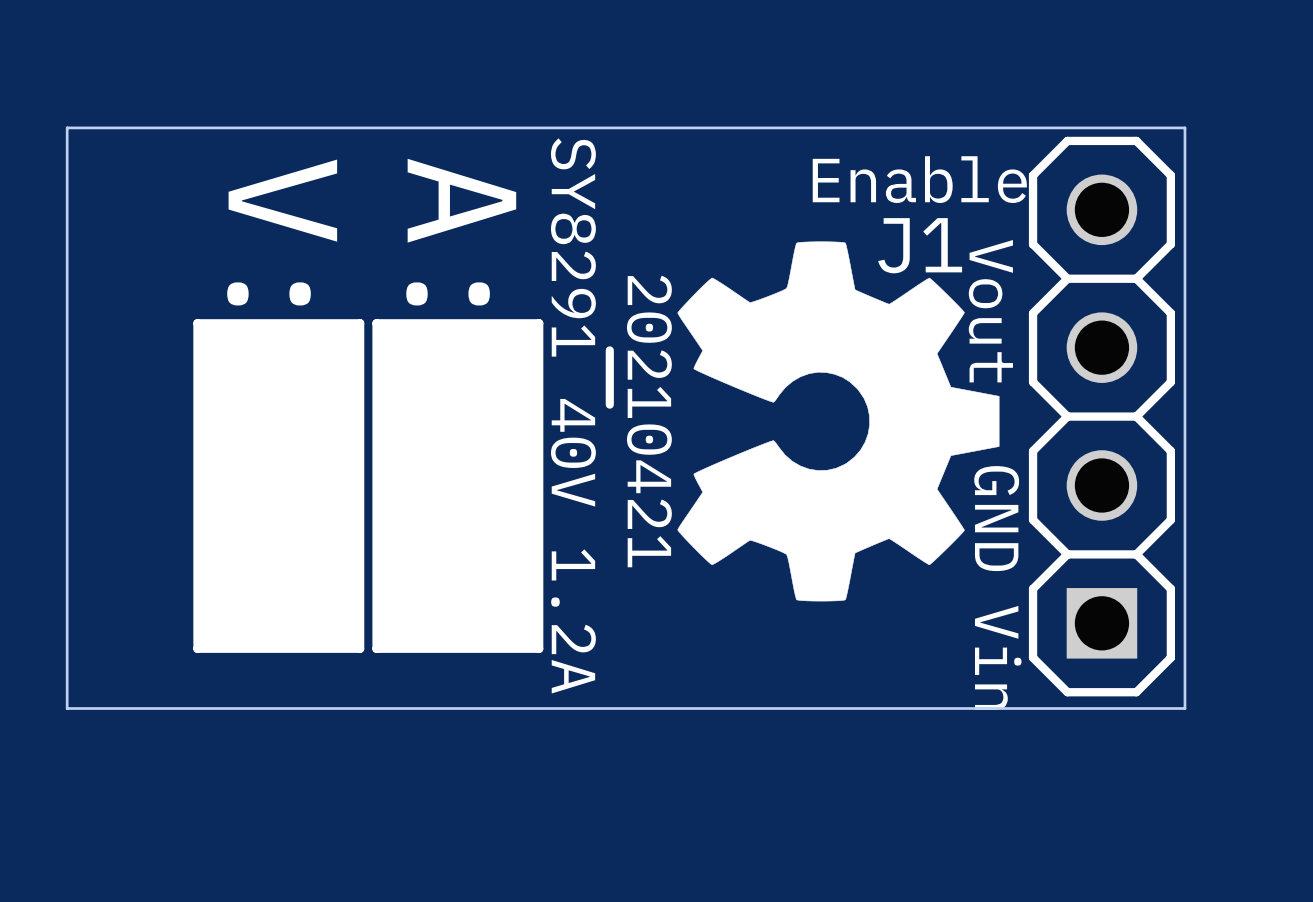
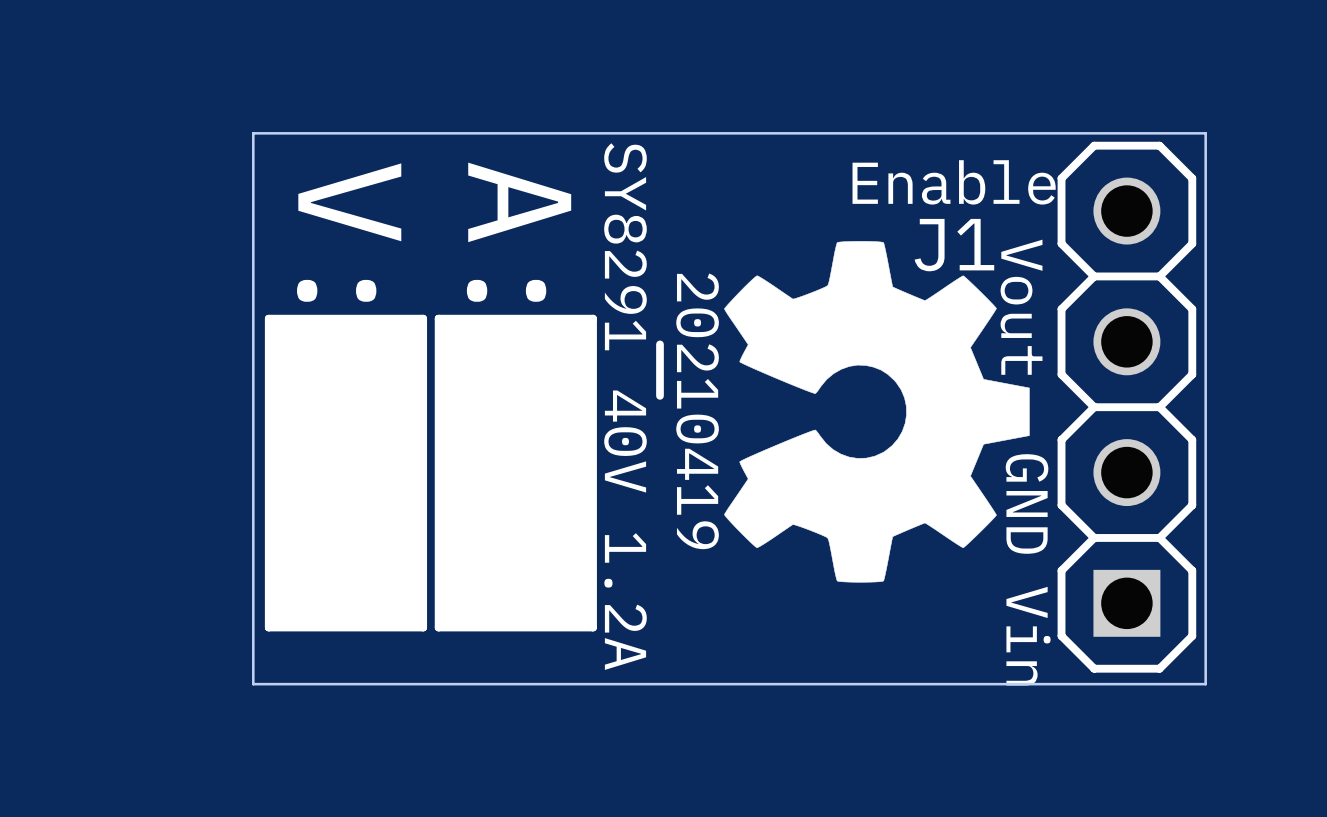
board edge: (181, 127) (67, 127) (67, 708) (181, 708) -> (253, 133) (253, 684)
drawing shape: [605, 275, 672, 568] -> [656, 273, 719, 550]

